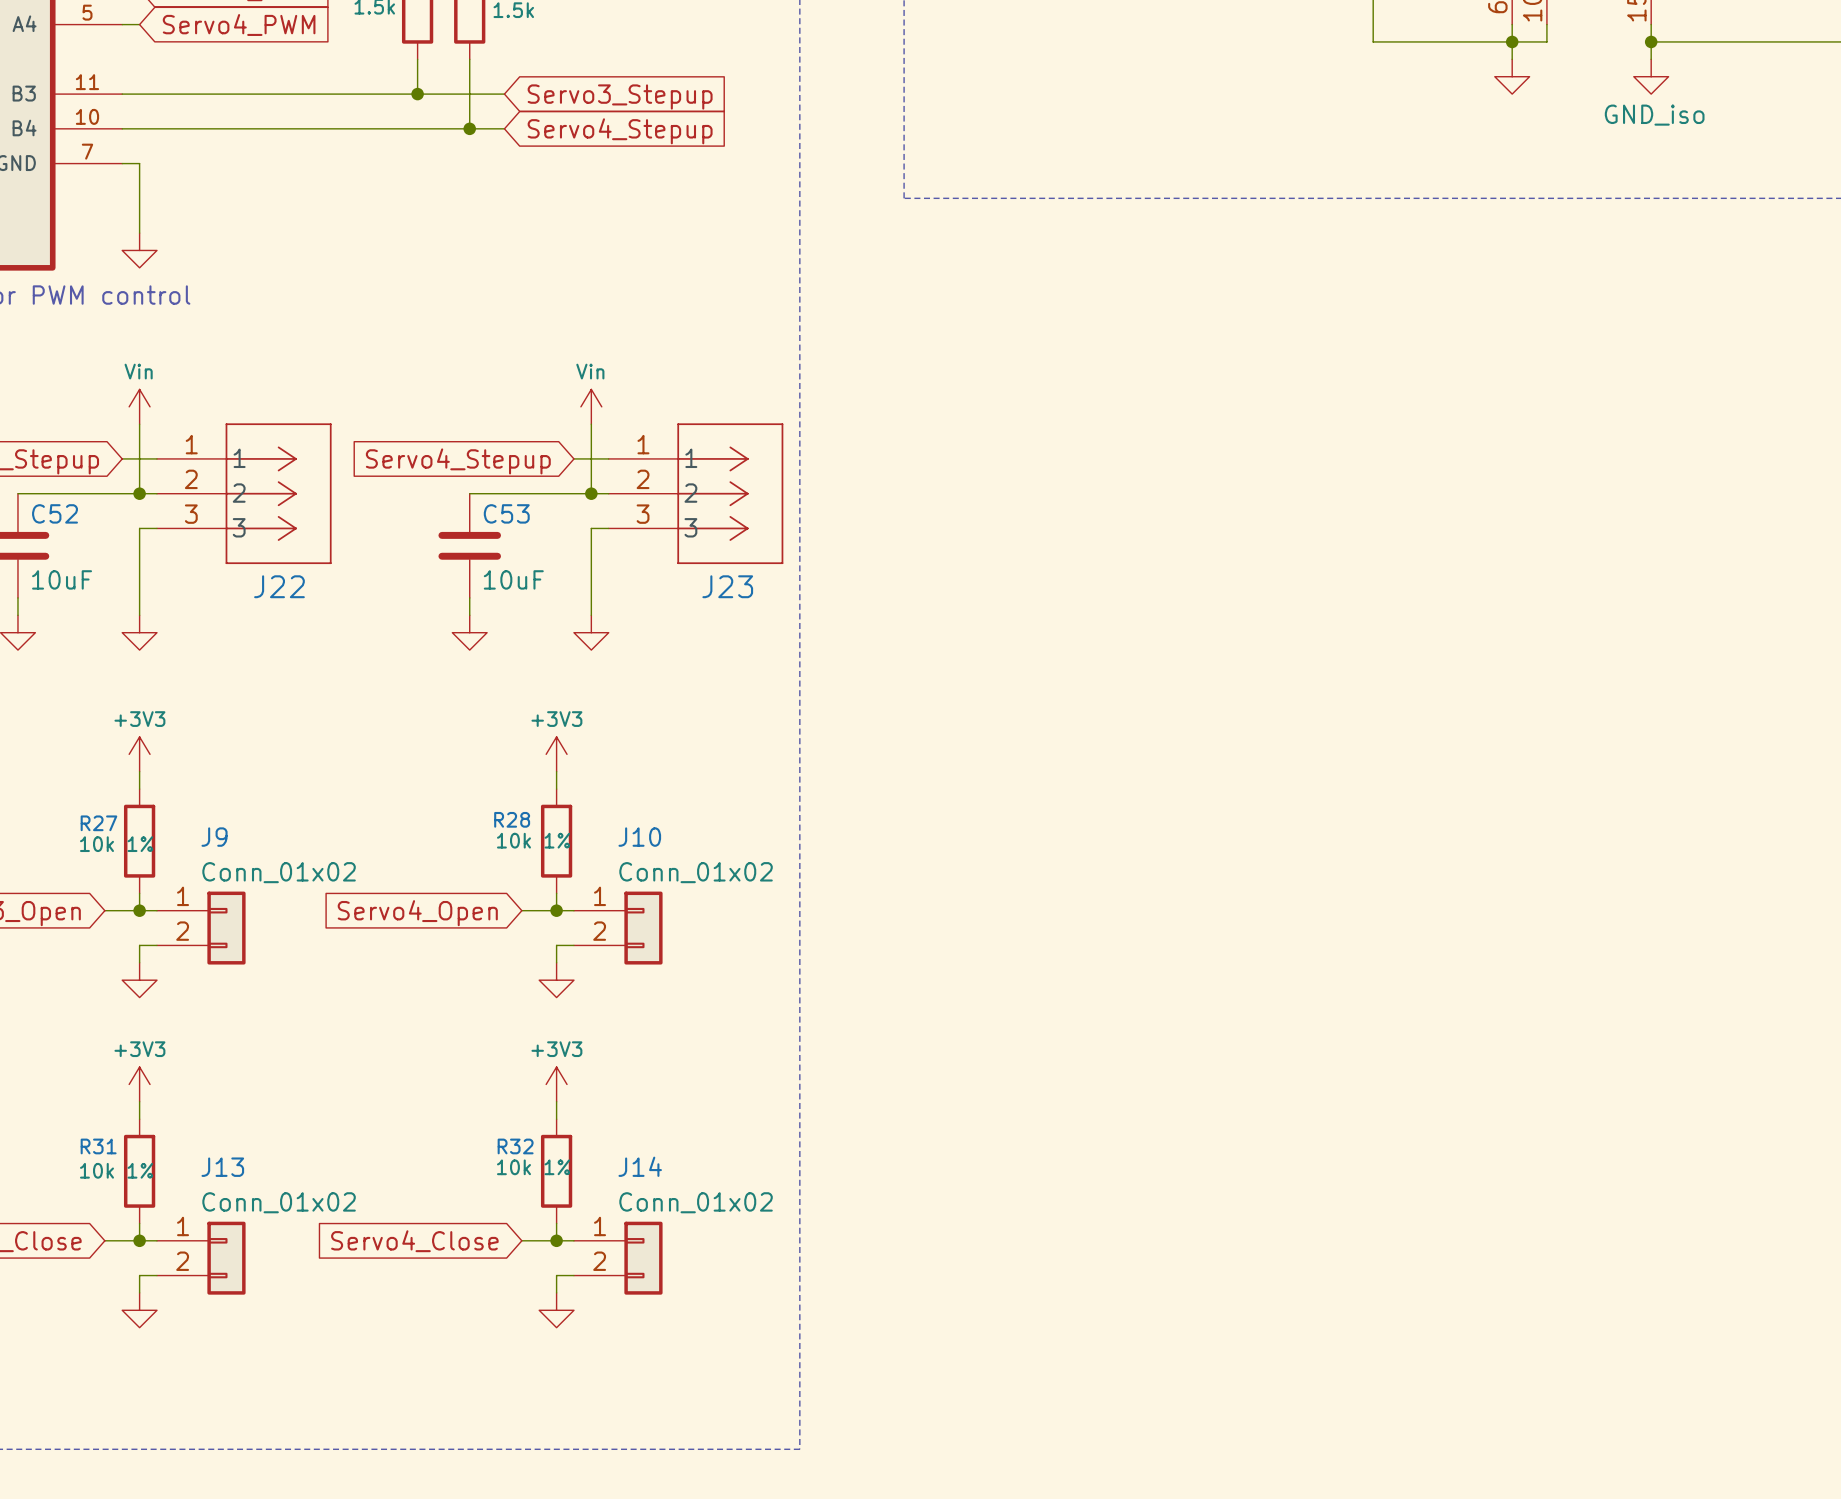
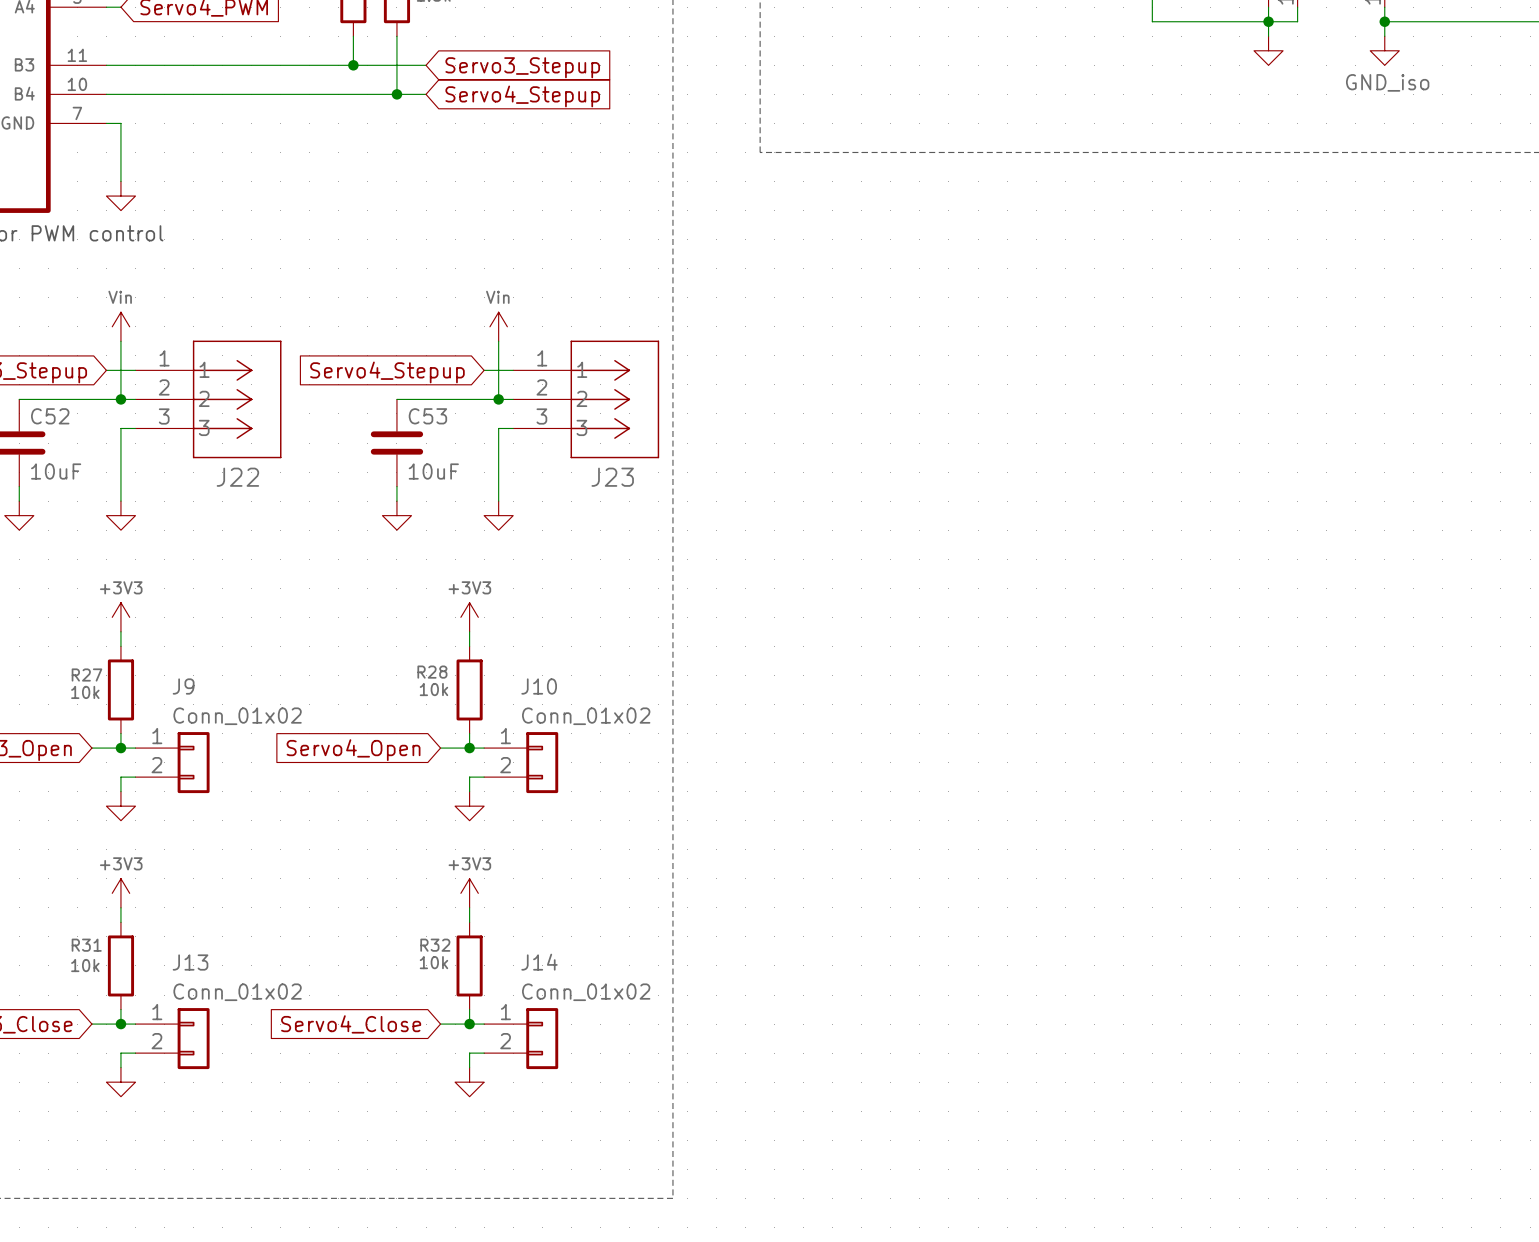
R28 value: 10k 1% (533, 840) -> 10k (433, 689)
R27 value: 10k 1% (116, 844) -> 10k (85, 692)
R32 value: 10k 1% (533, 1167) -> 10k (433, 962)
R31 value: 10k 1% (116, 1170) -> 10k (85, 965)

